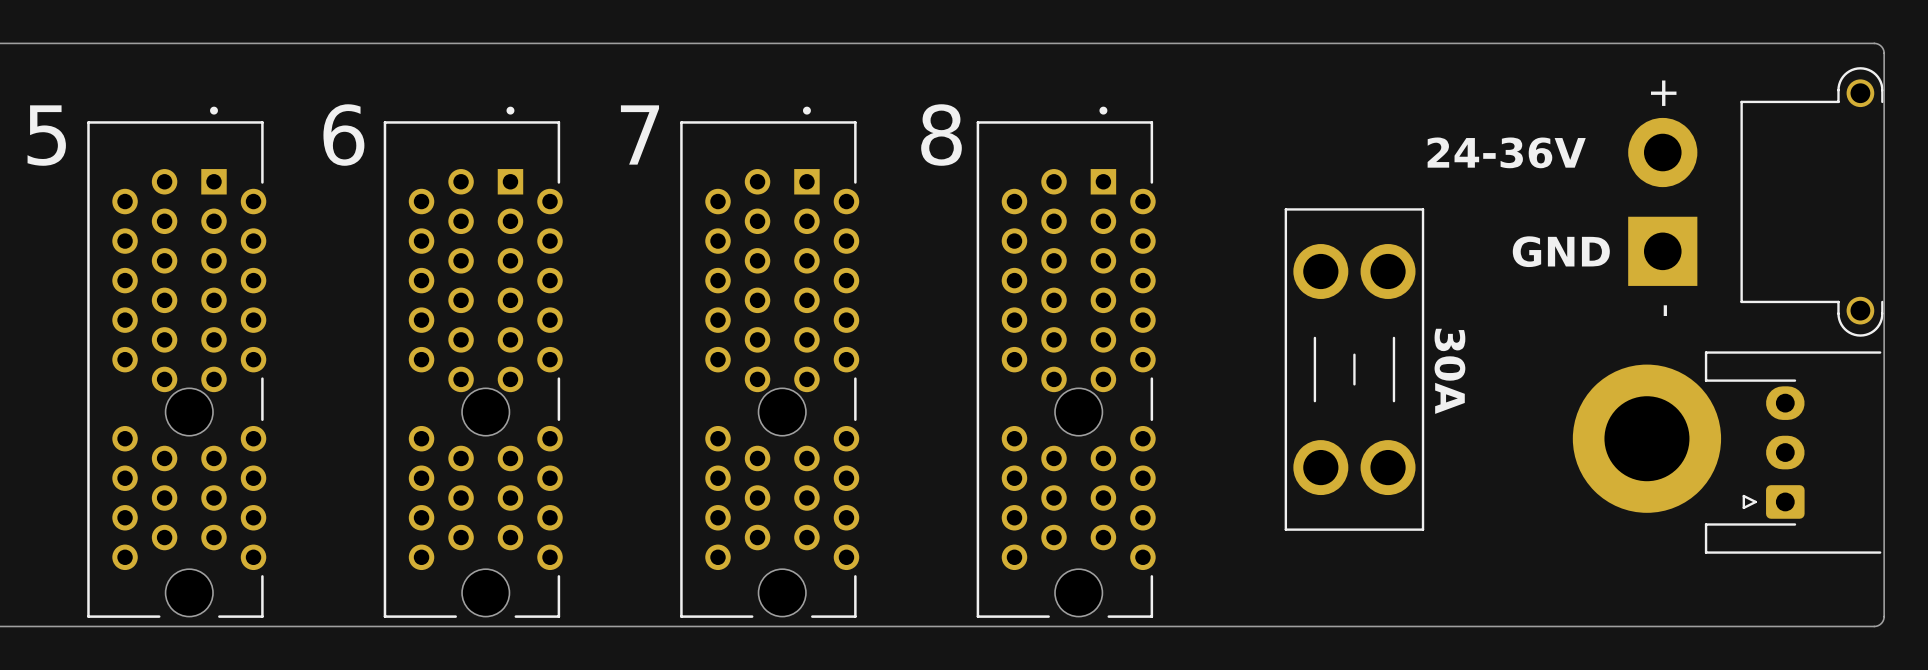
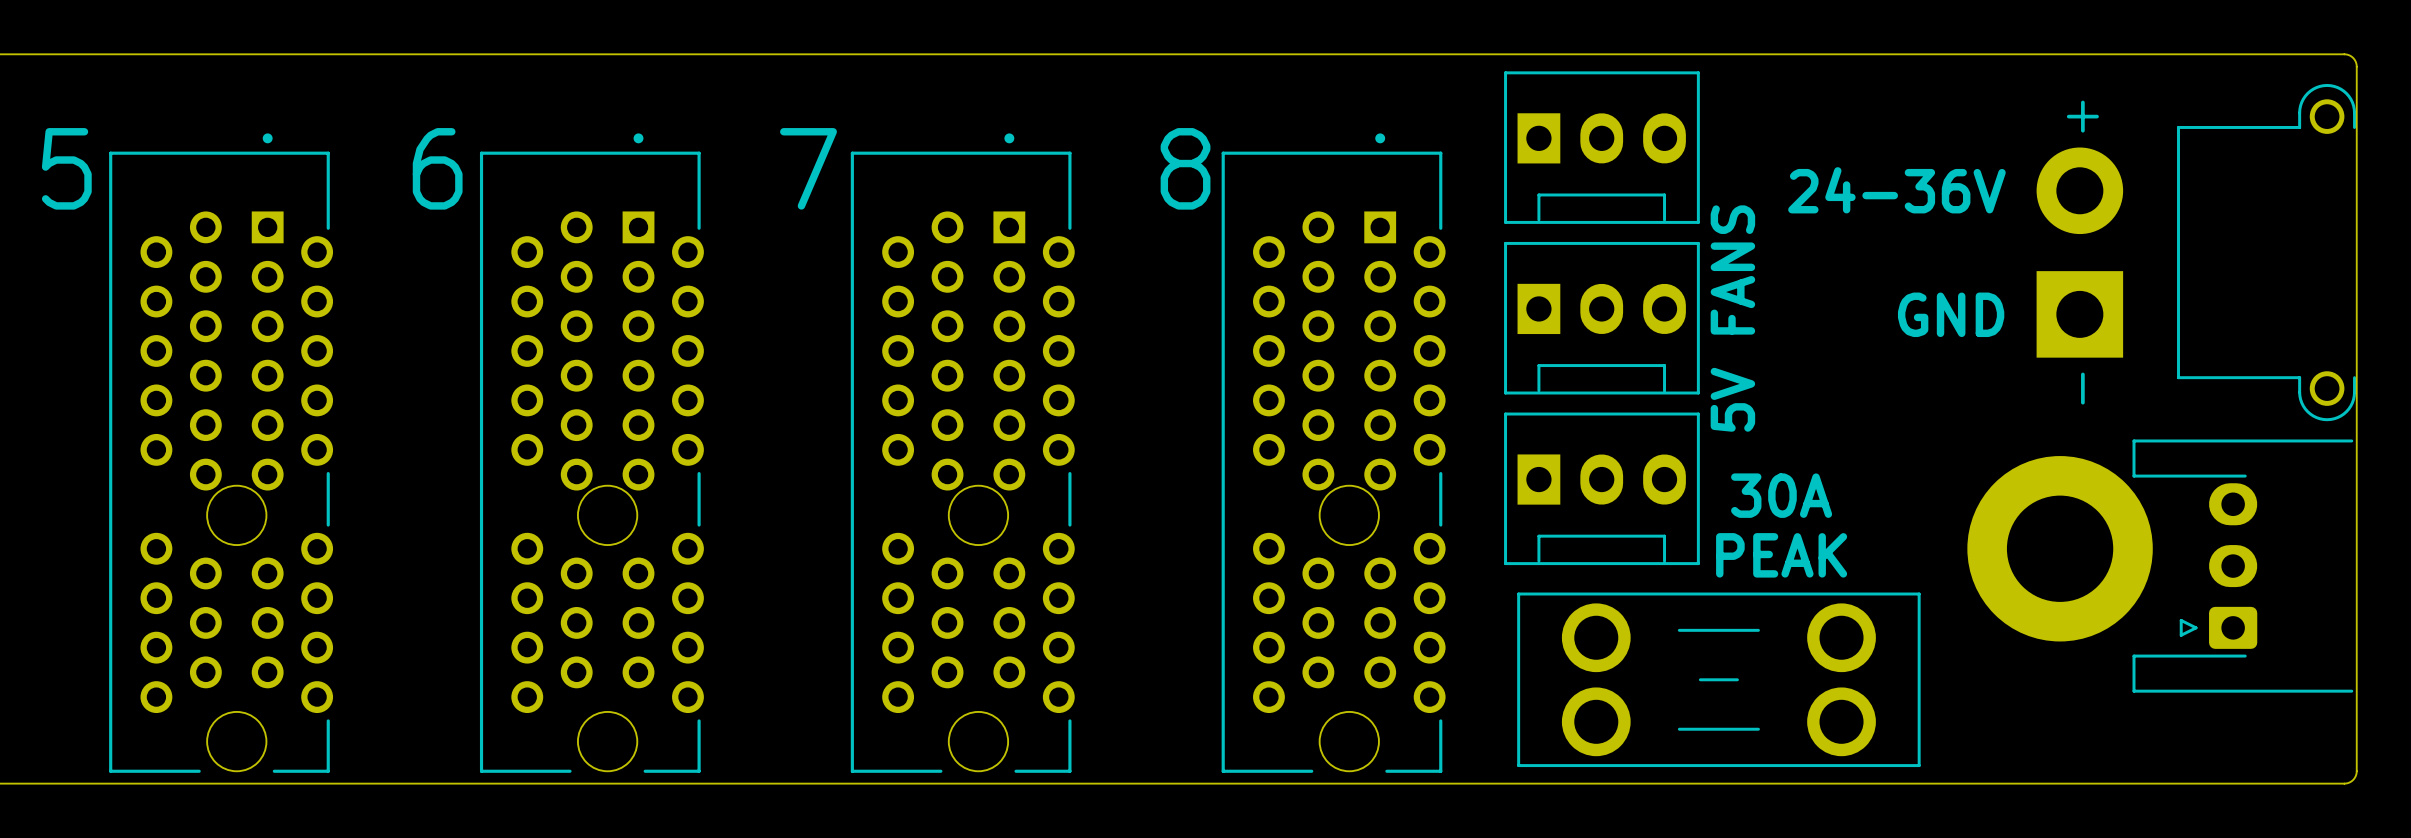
part: none -> (1601, 147)
text: none -> 5V FANS (1732, 318)
part: none -> (1601, 318)
part rotation: 0° (1354, 369) -> 90° clockwise (1718, 679)
text rotation: 0° (1449, 371) -> 90° counterclockwise (1781, 495)
part: none -> (1601, 488)
text: none -> PEAK (1781, 555)

